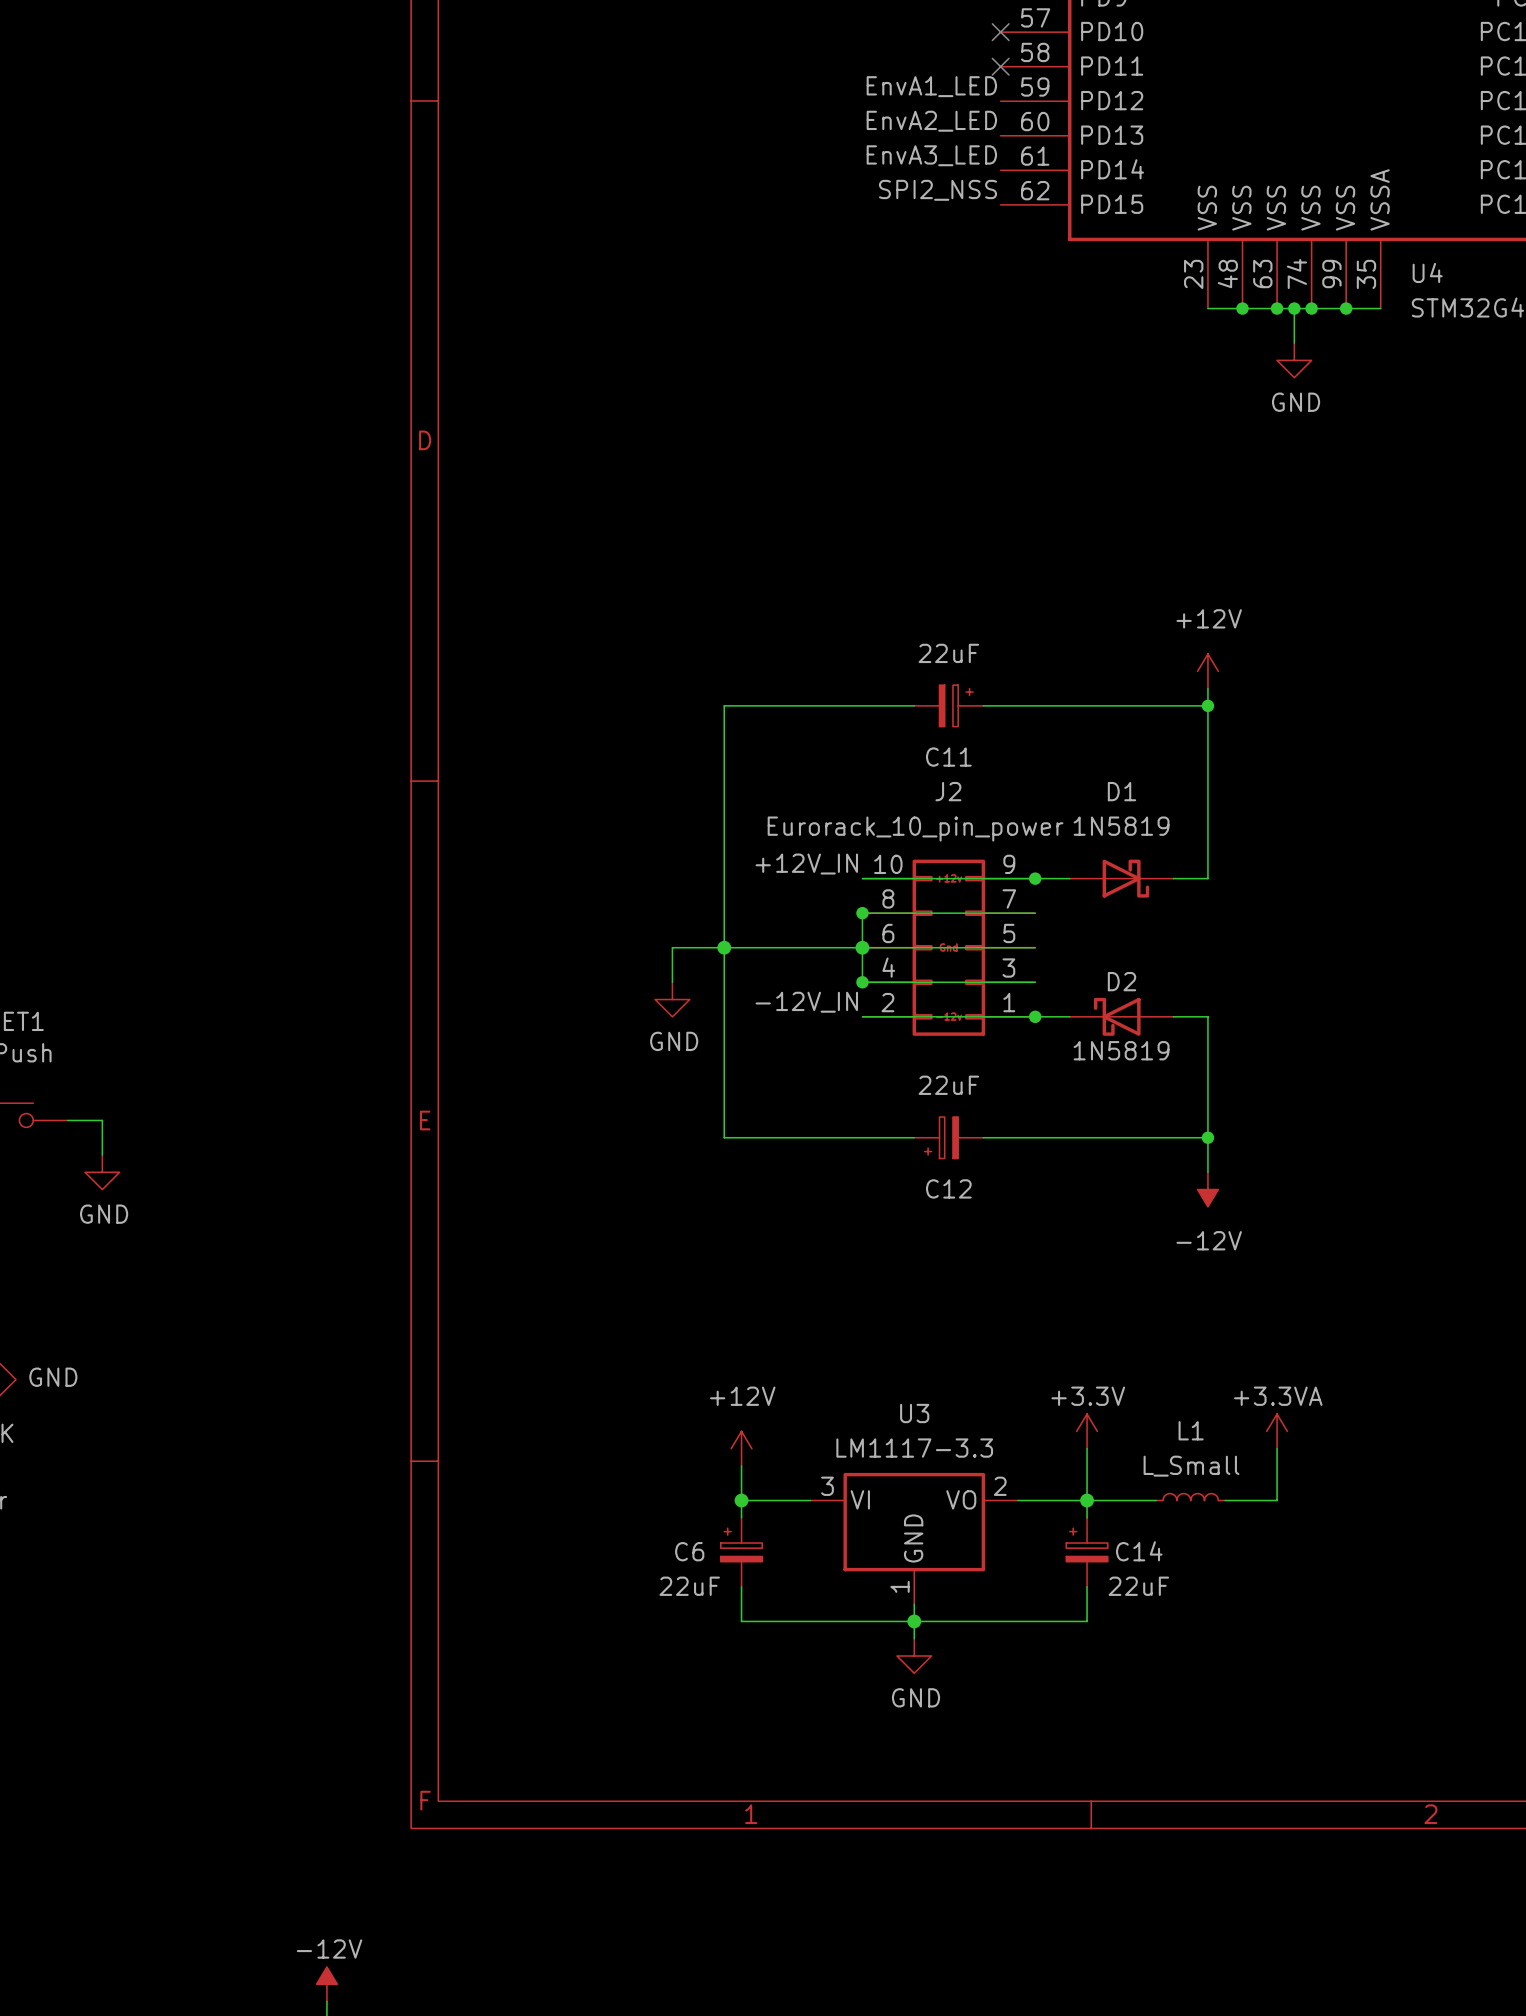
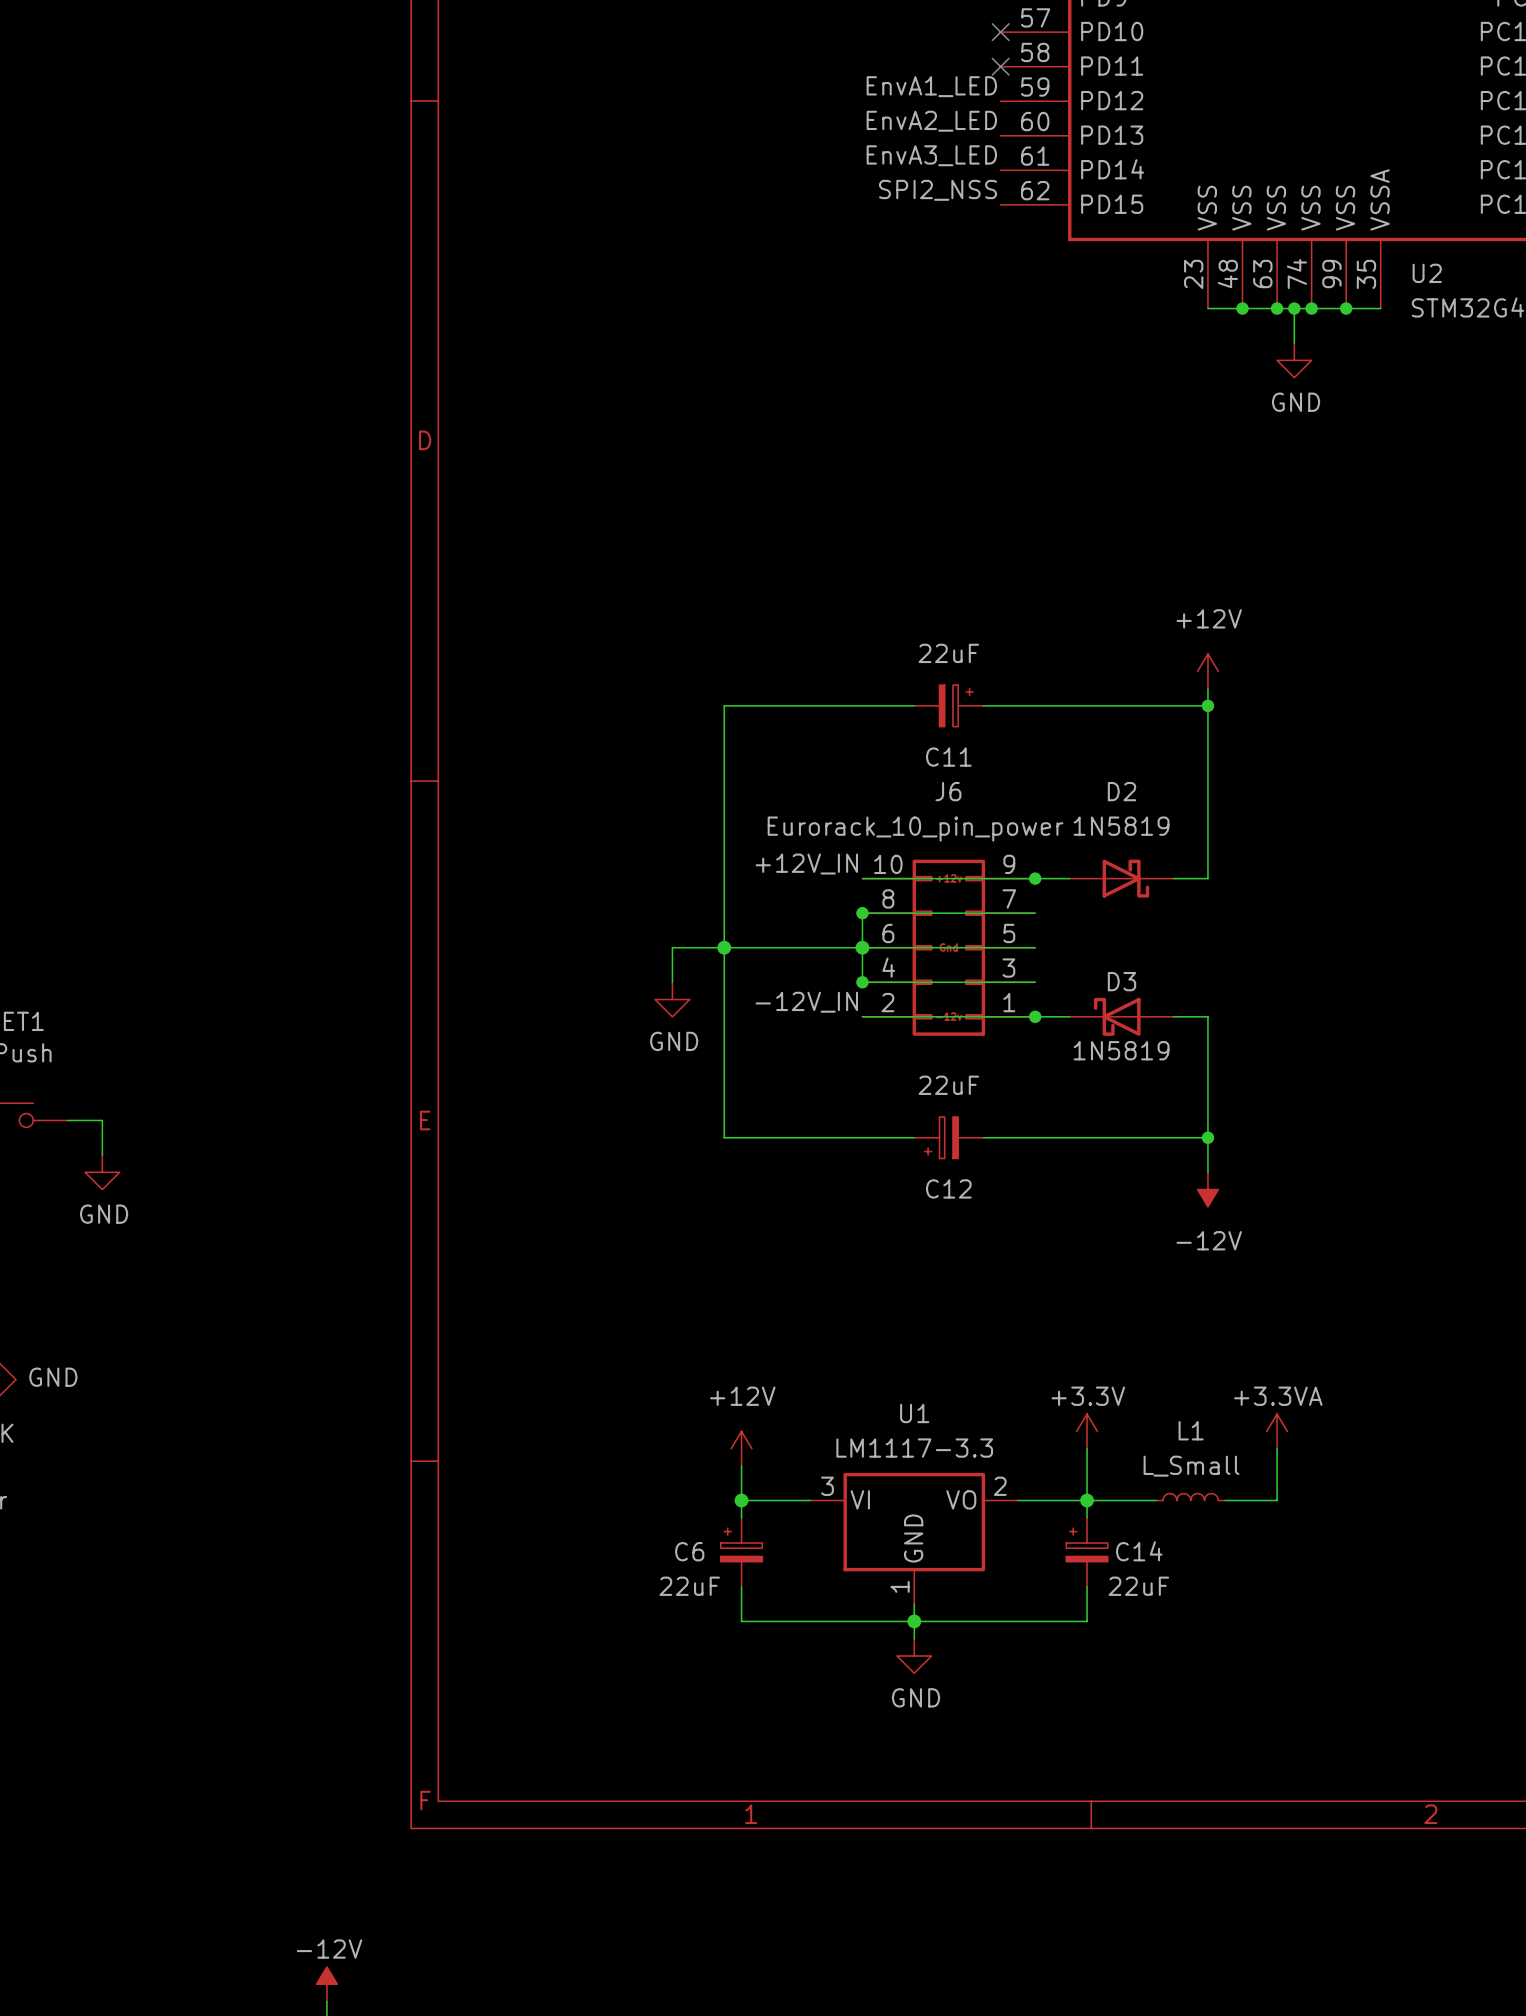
U4 name: U4 (1427, 272) -> U2 (1427, 273)
J2 name: J2 (948, 791) -> J6 (948, 791)
D1 name: D1 (1122, 791) -> D2 (1122, 791)
D2 name: D2 (1122, 981) -> D3 (1122, 981)
U3 name: U3 (914, 1413) -> U1 (914, 1413)

